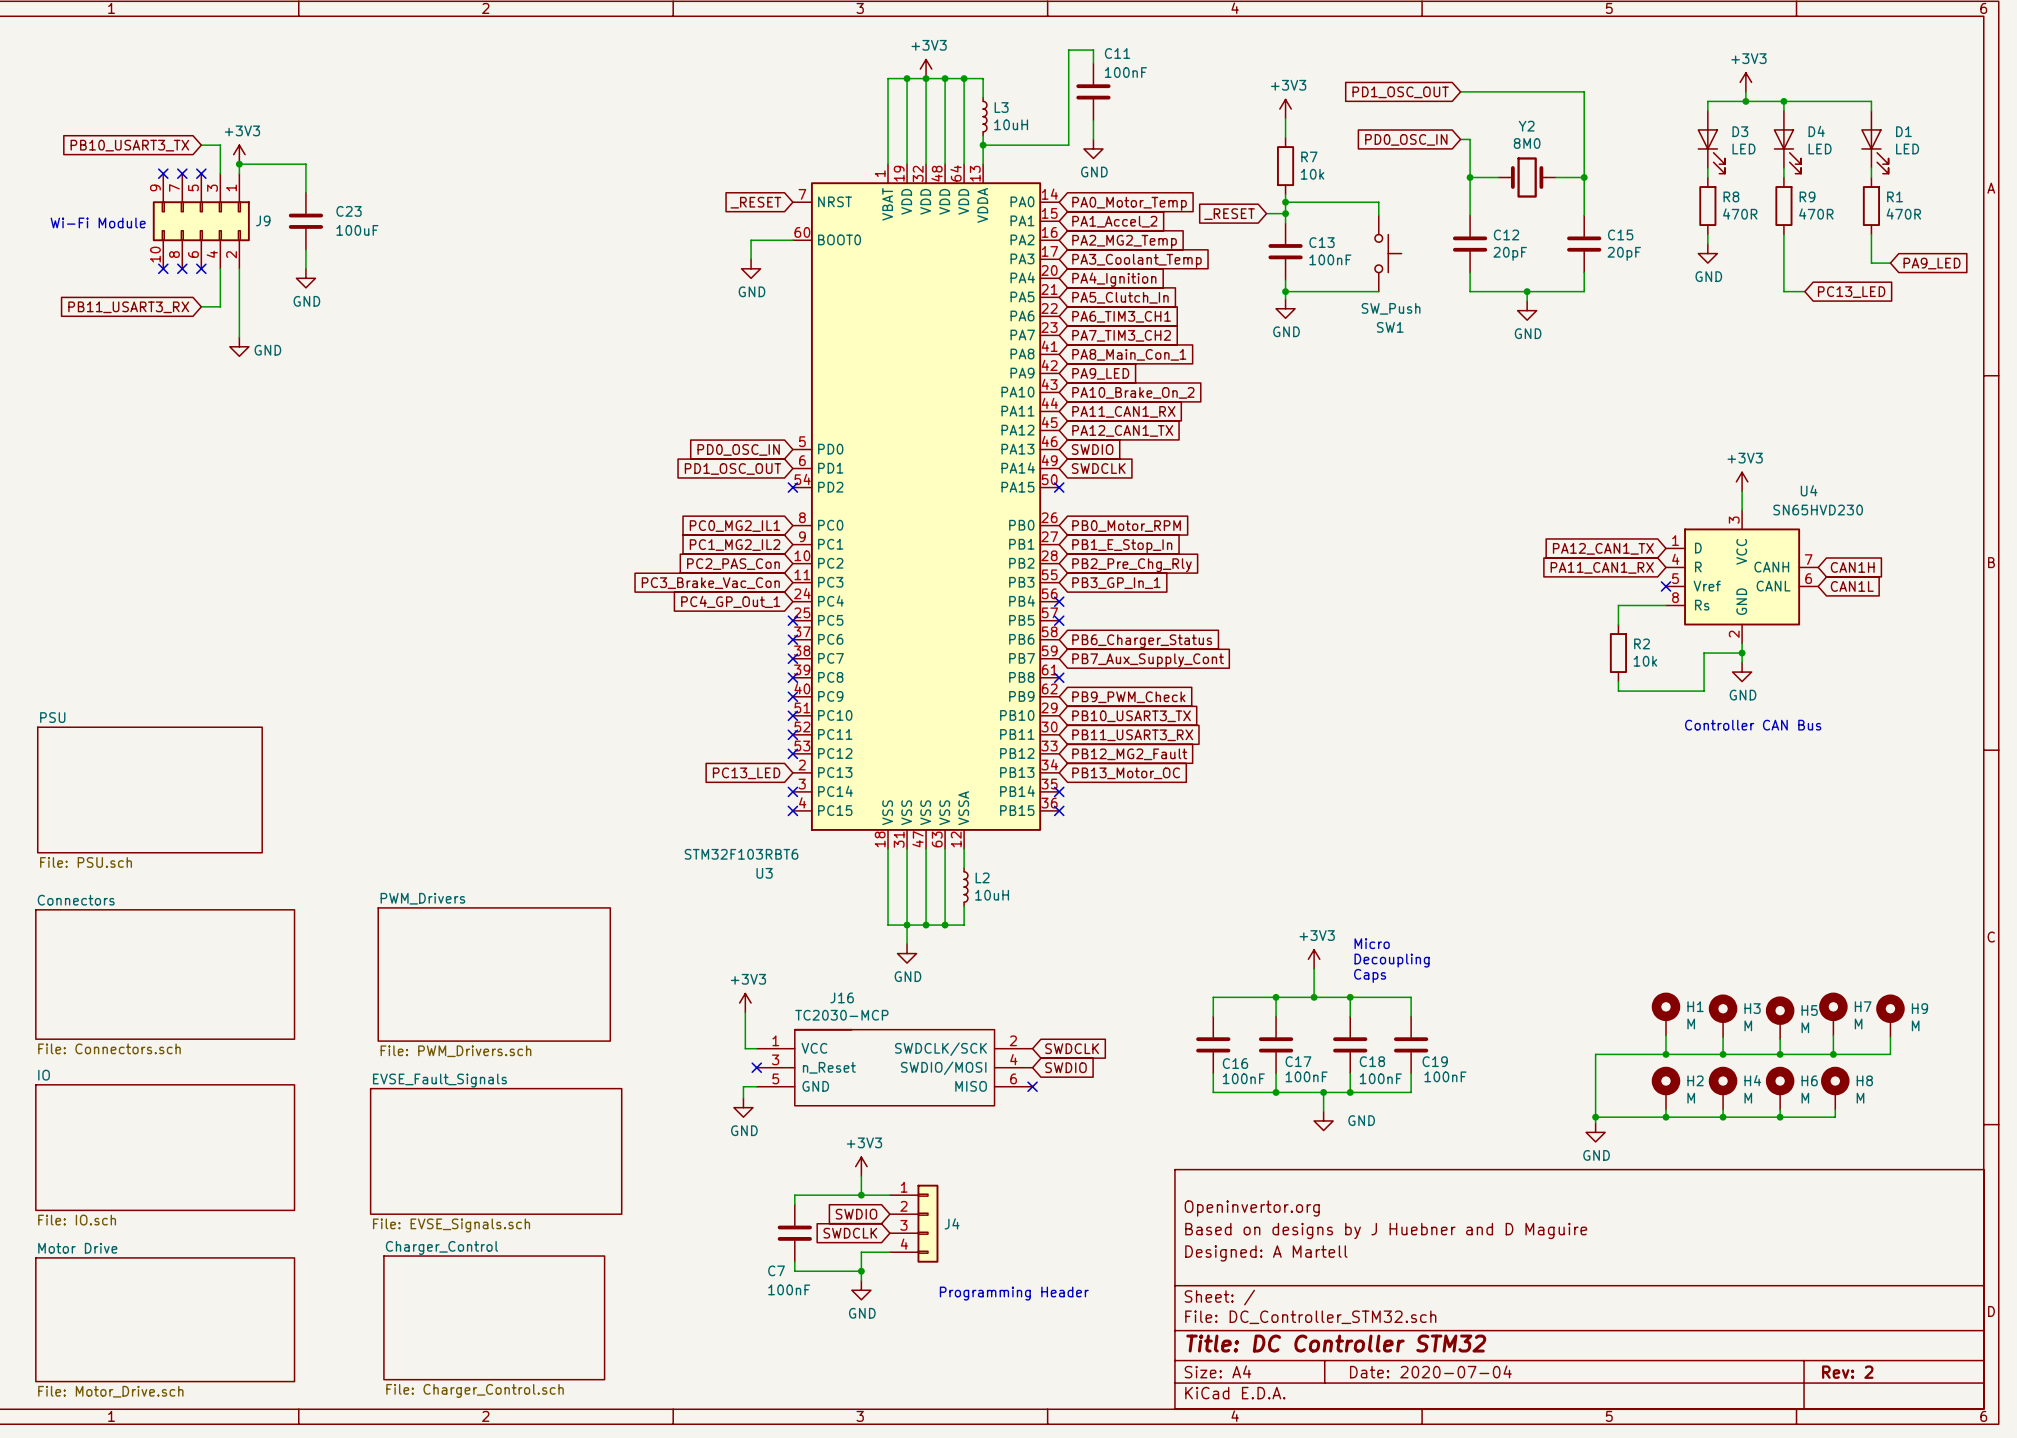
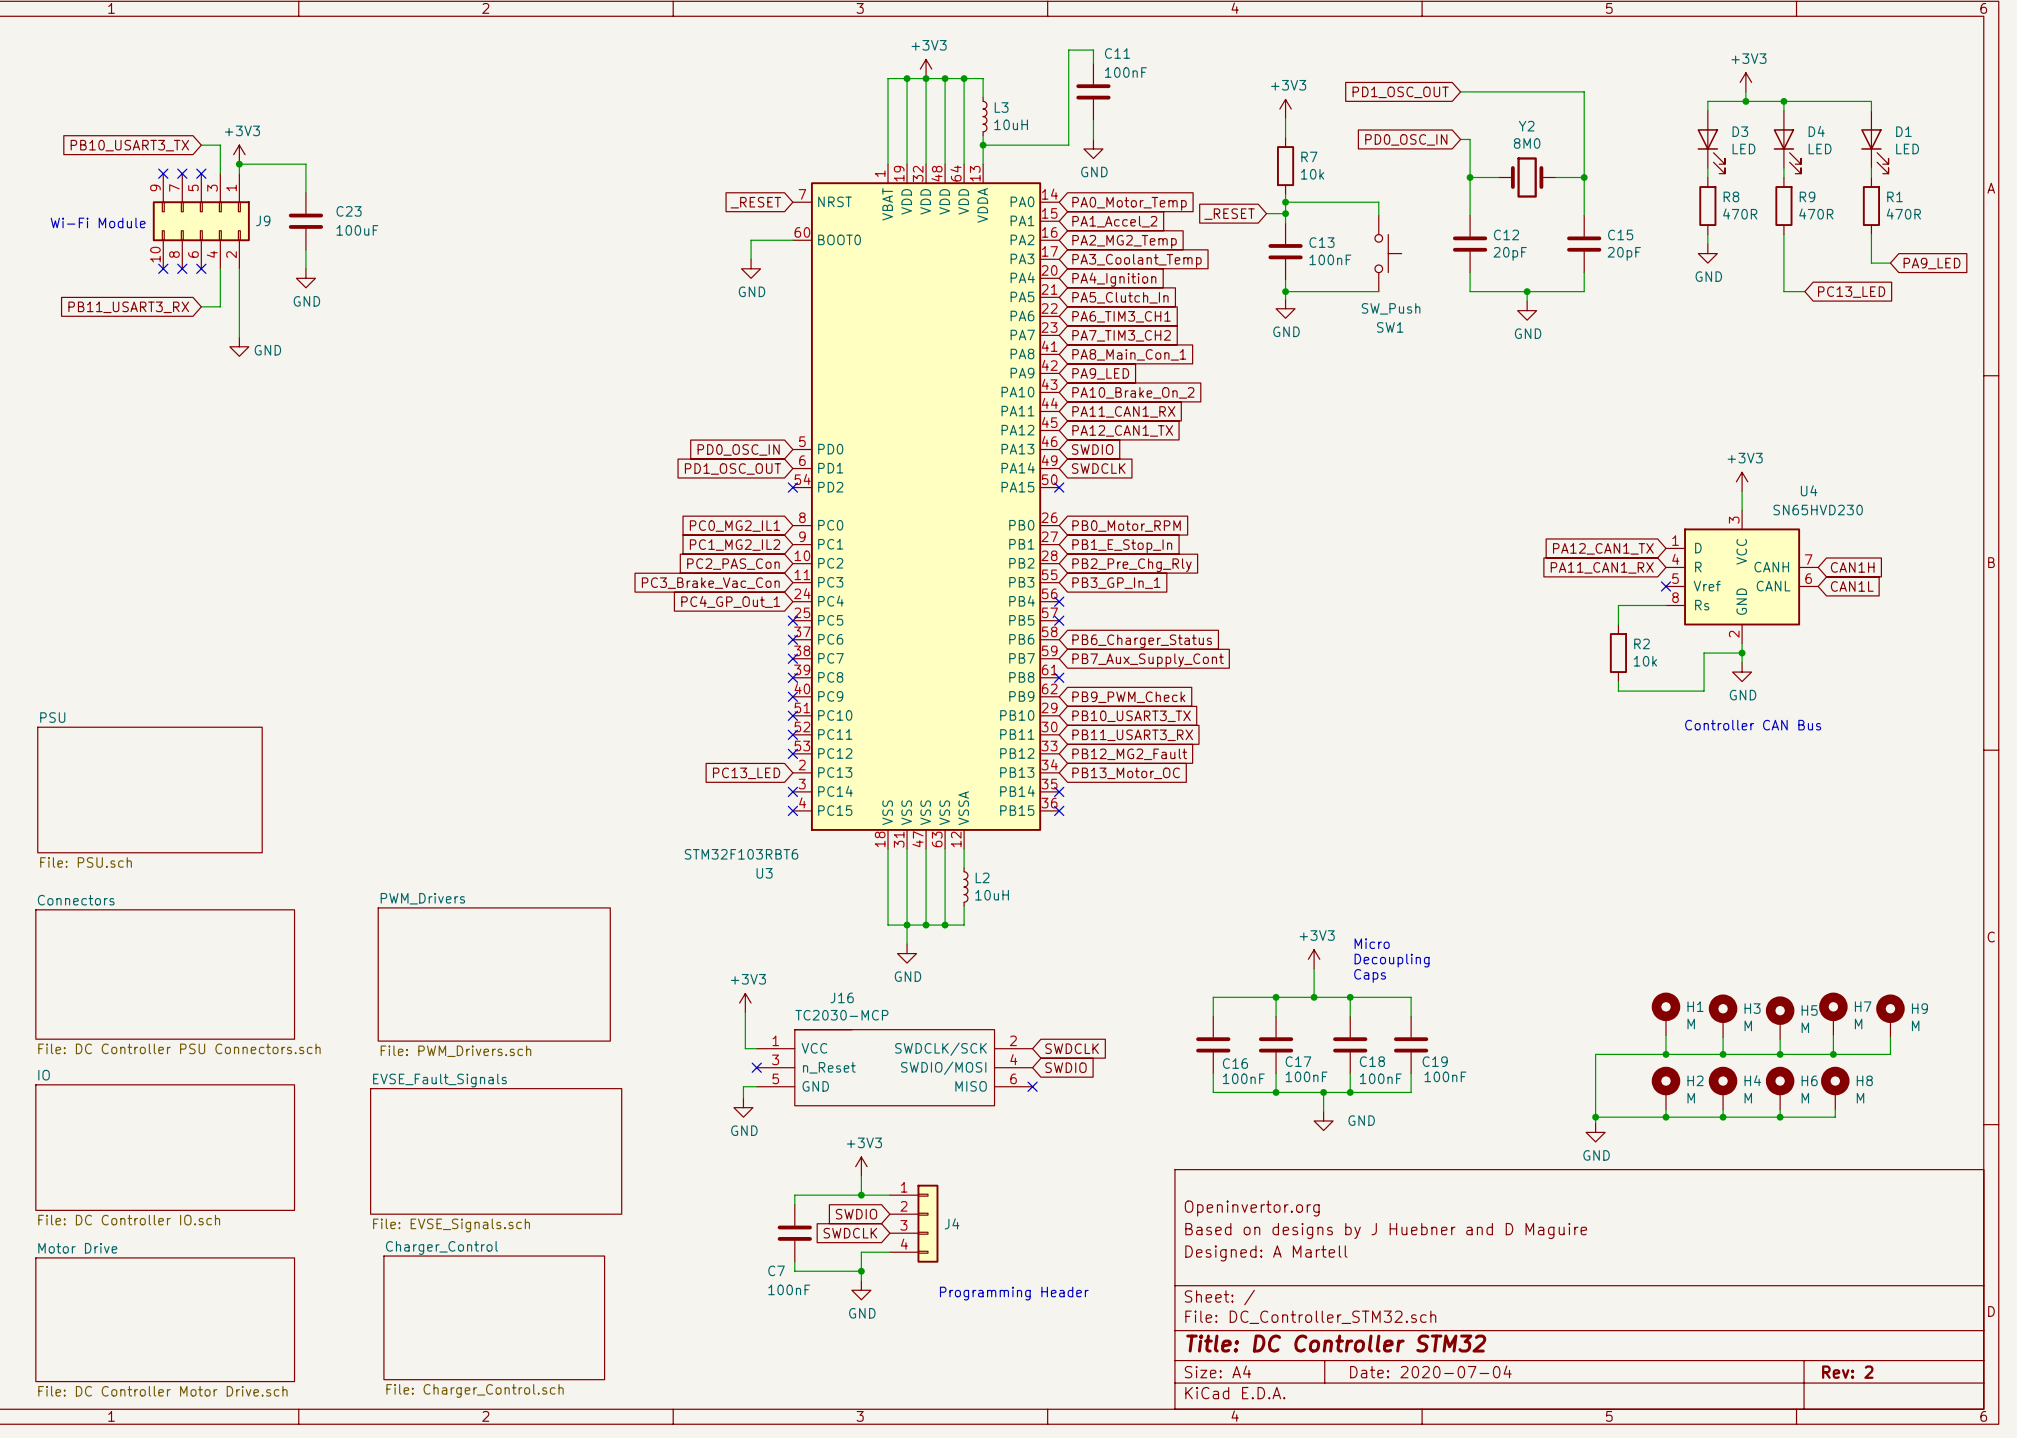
sheet Connectors value: File: Connectors.sch (109, 1048) -> File: DC Controller PSU Connectors.sch (179, 1048)
sheet IO value: File: IO.sch (77, 1220) -> File: DC Controller IO.sch (129, 1220)
sheet Motor Drive value: File: Motor_Drive.sch (110, 1391) -> File: DC Controller Motor Drive.sch (162, 1391)

